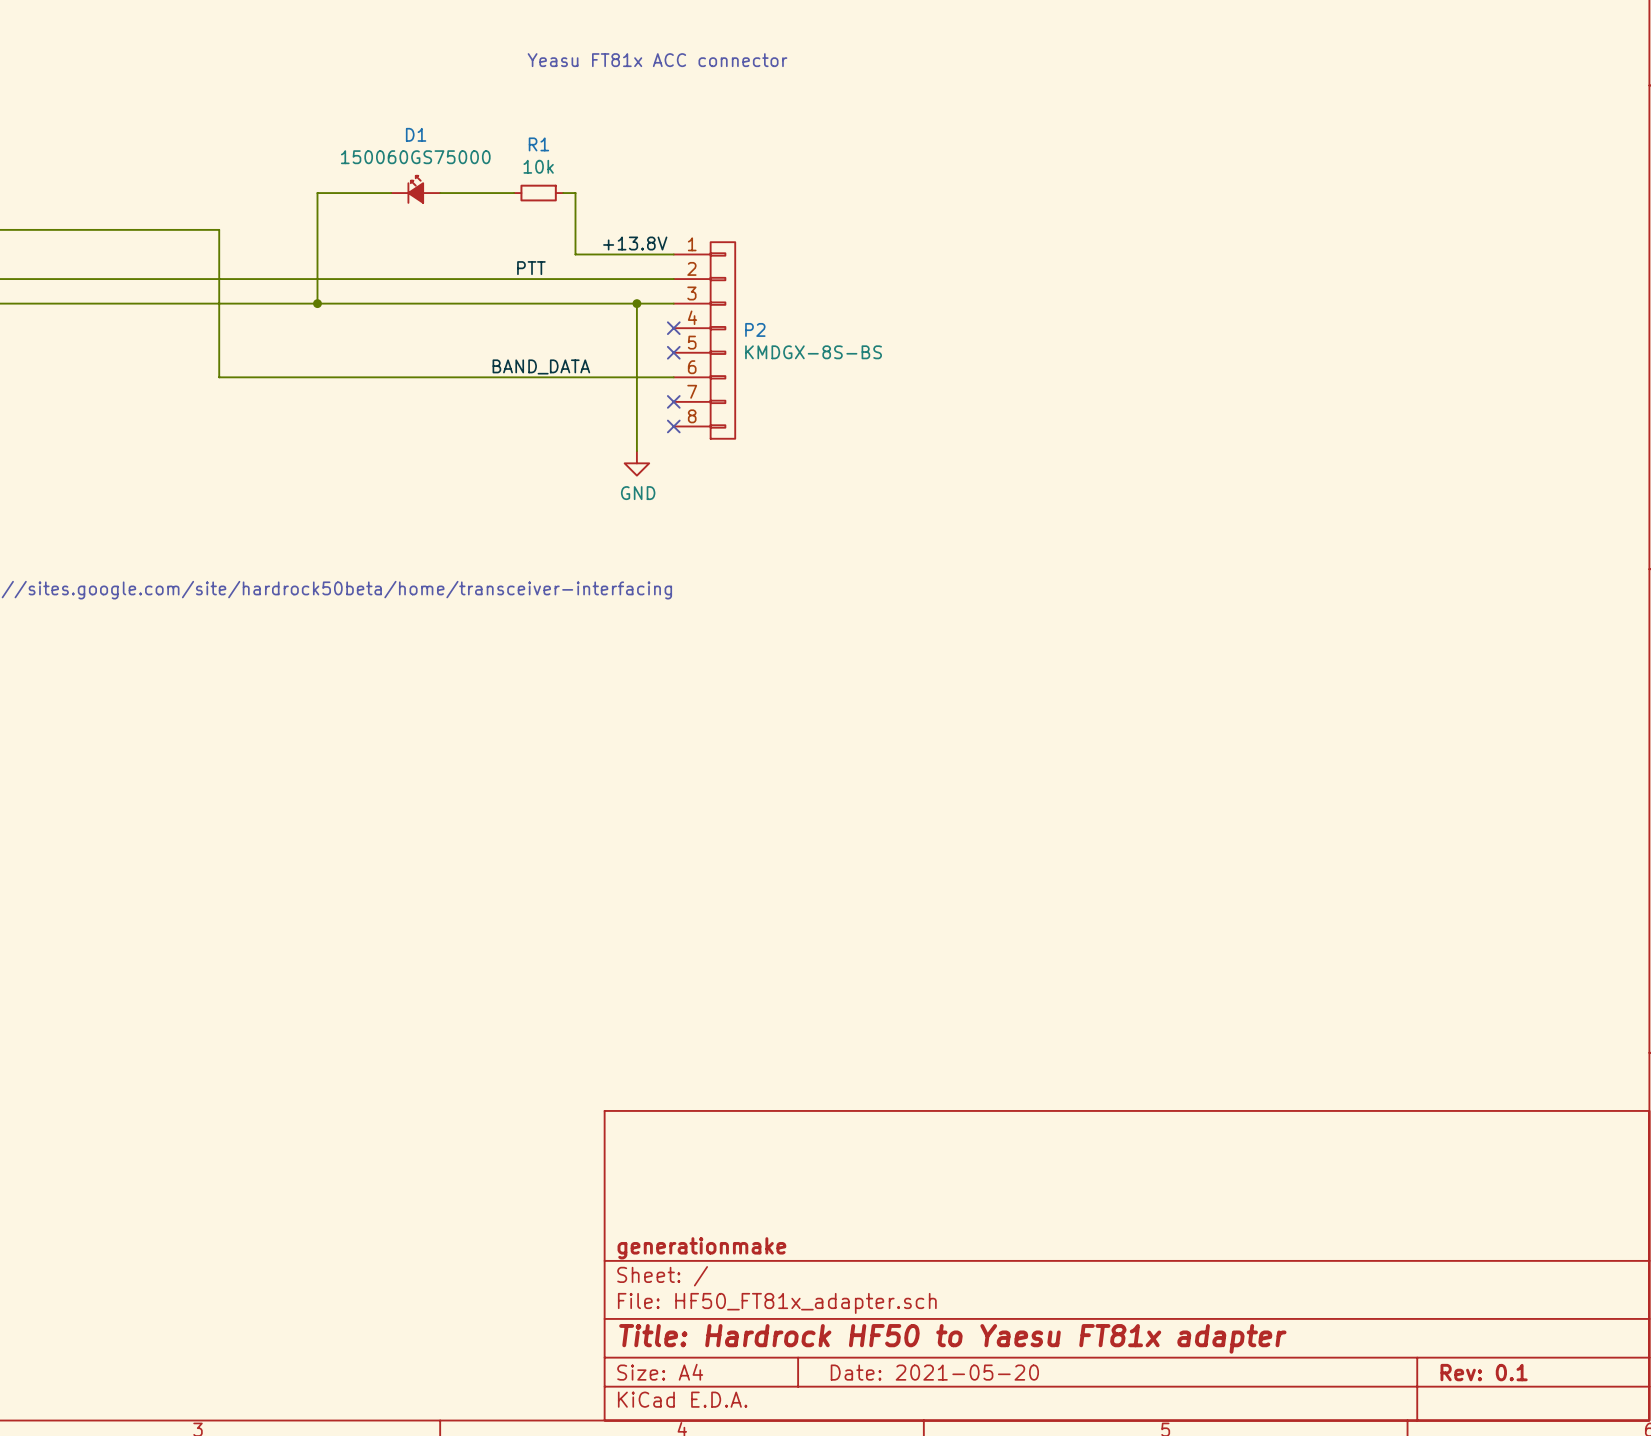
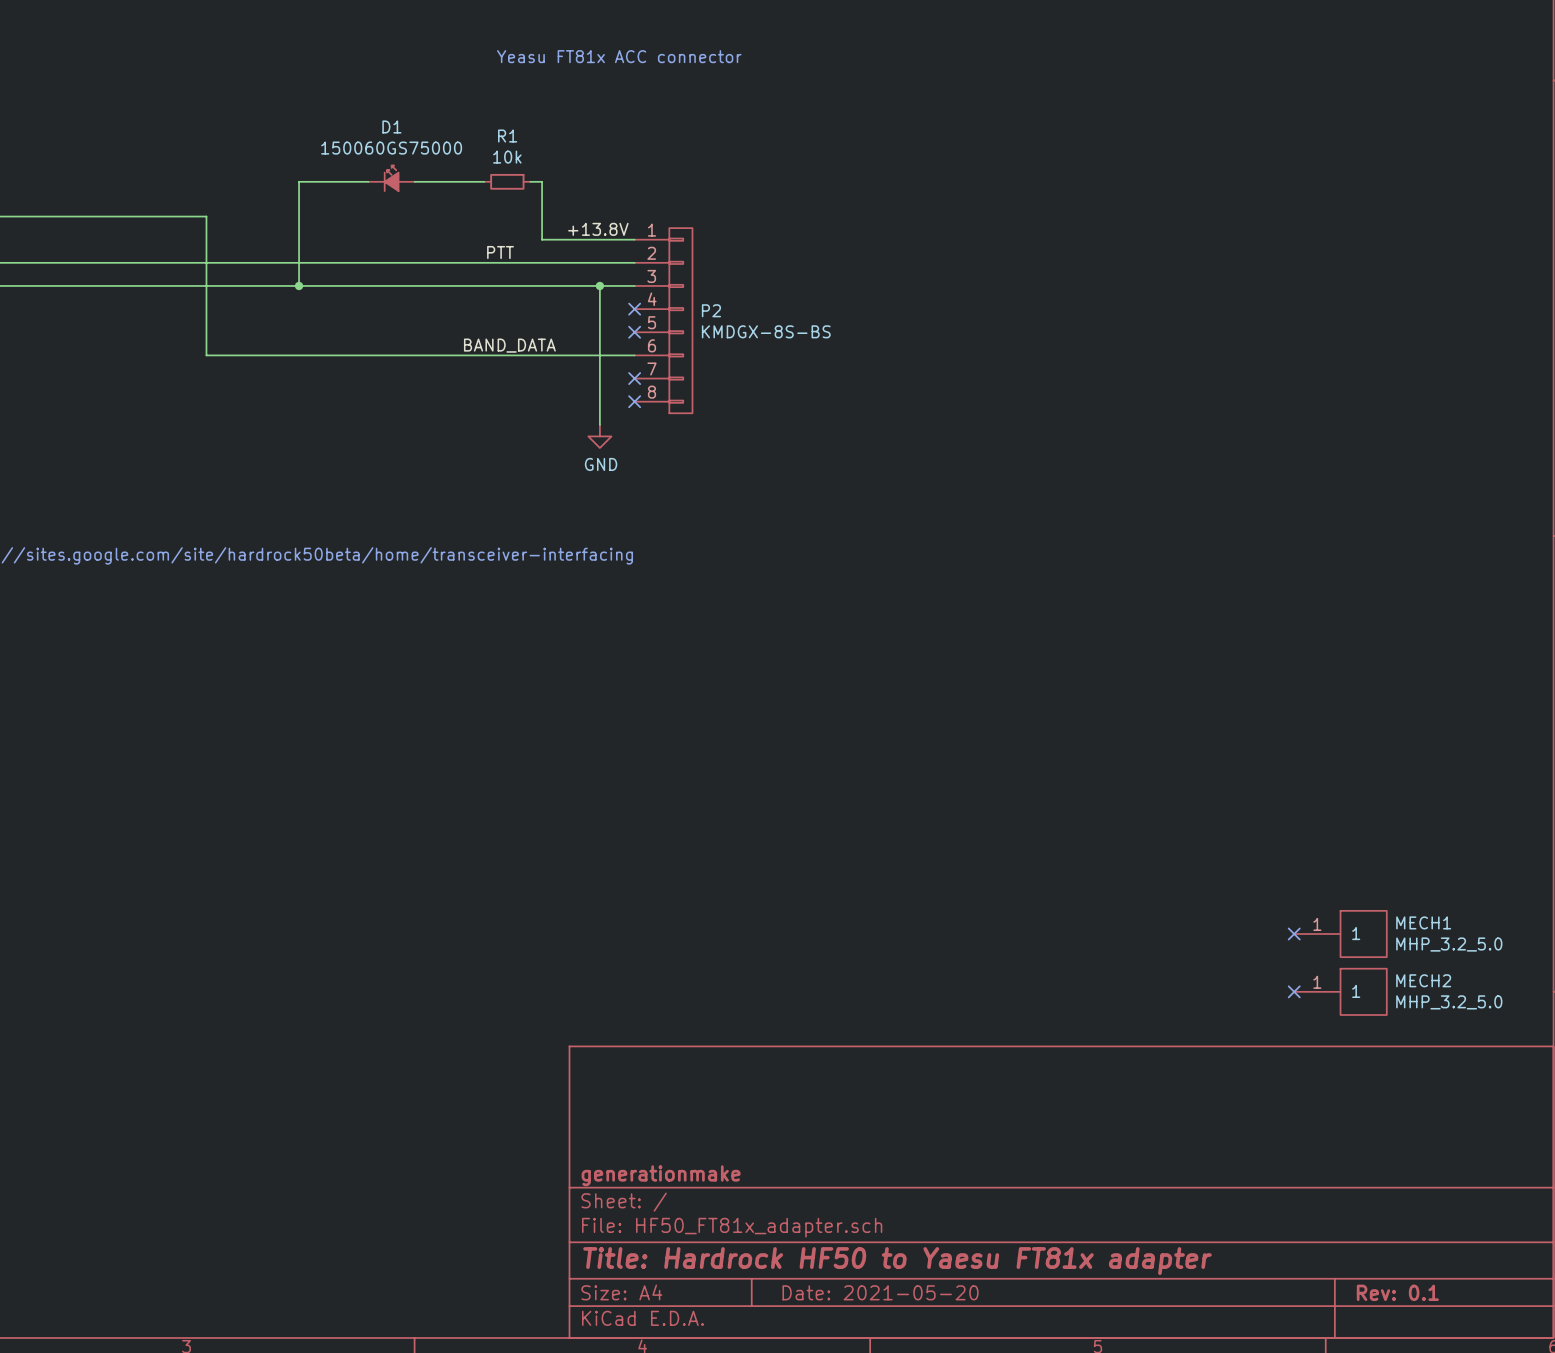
no-connect mark: none -> (1294, 934)
MECH1: none -> MHP_3.2_5.0 (1340, 934)
no-connect mark: none -> (1294, 991)
MECH2: none -> MHP_3.2_5.0 (1340, 991)

